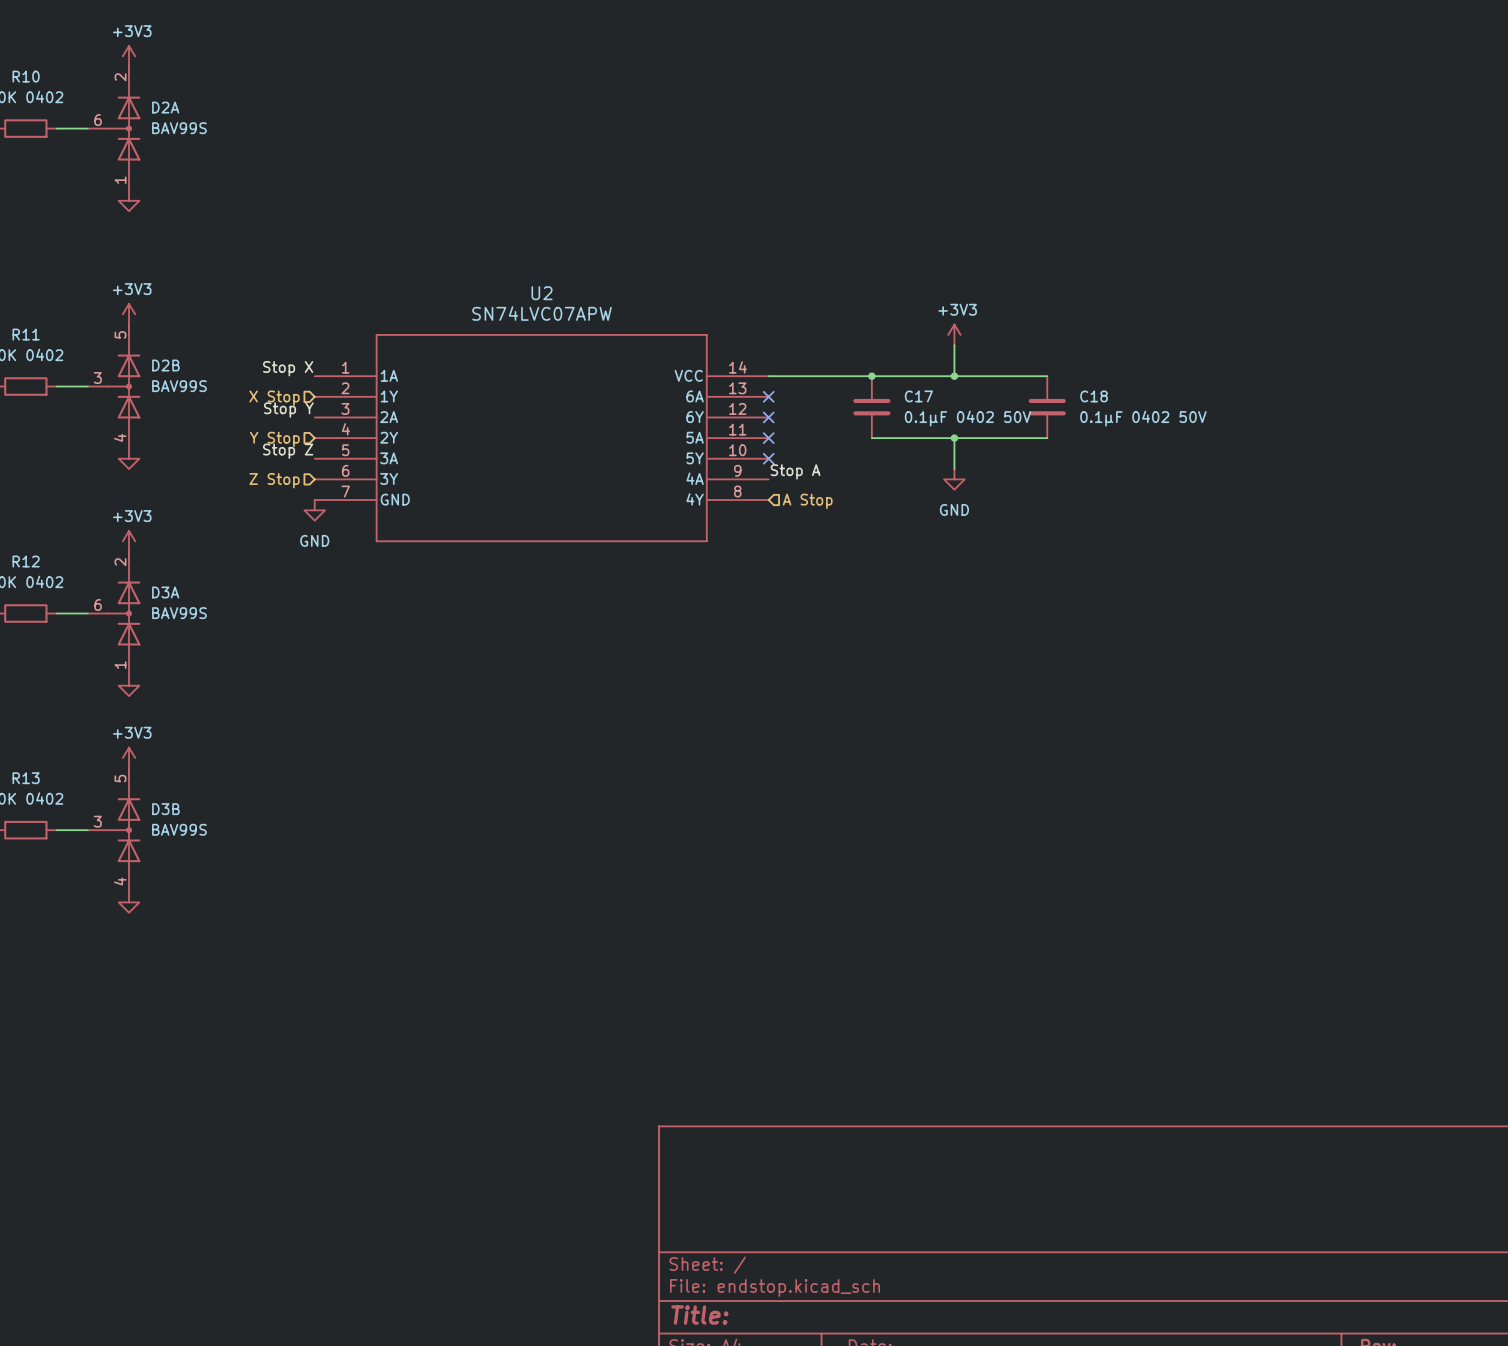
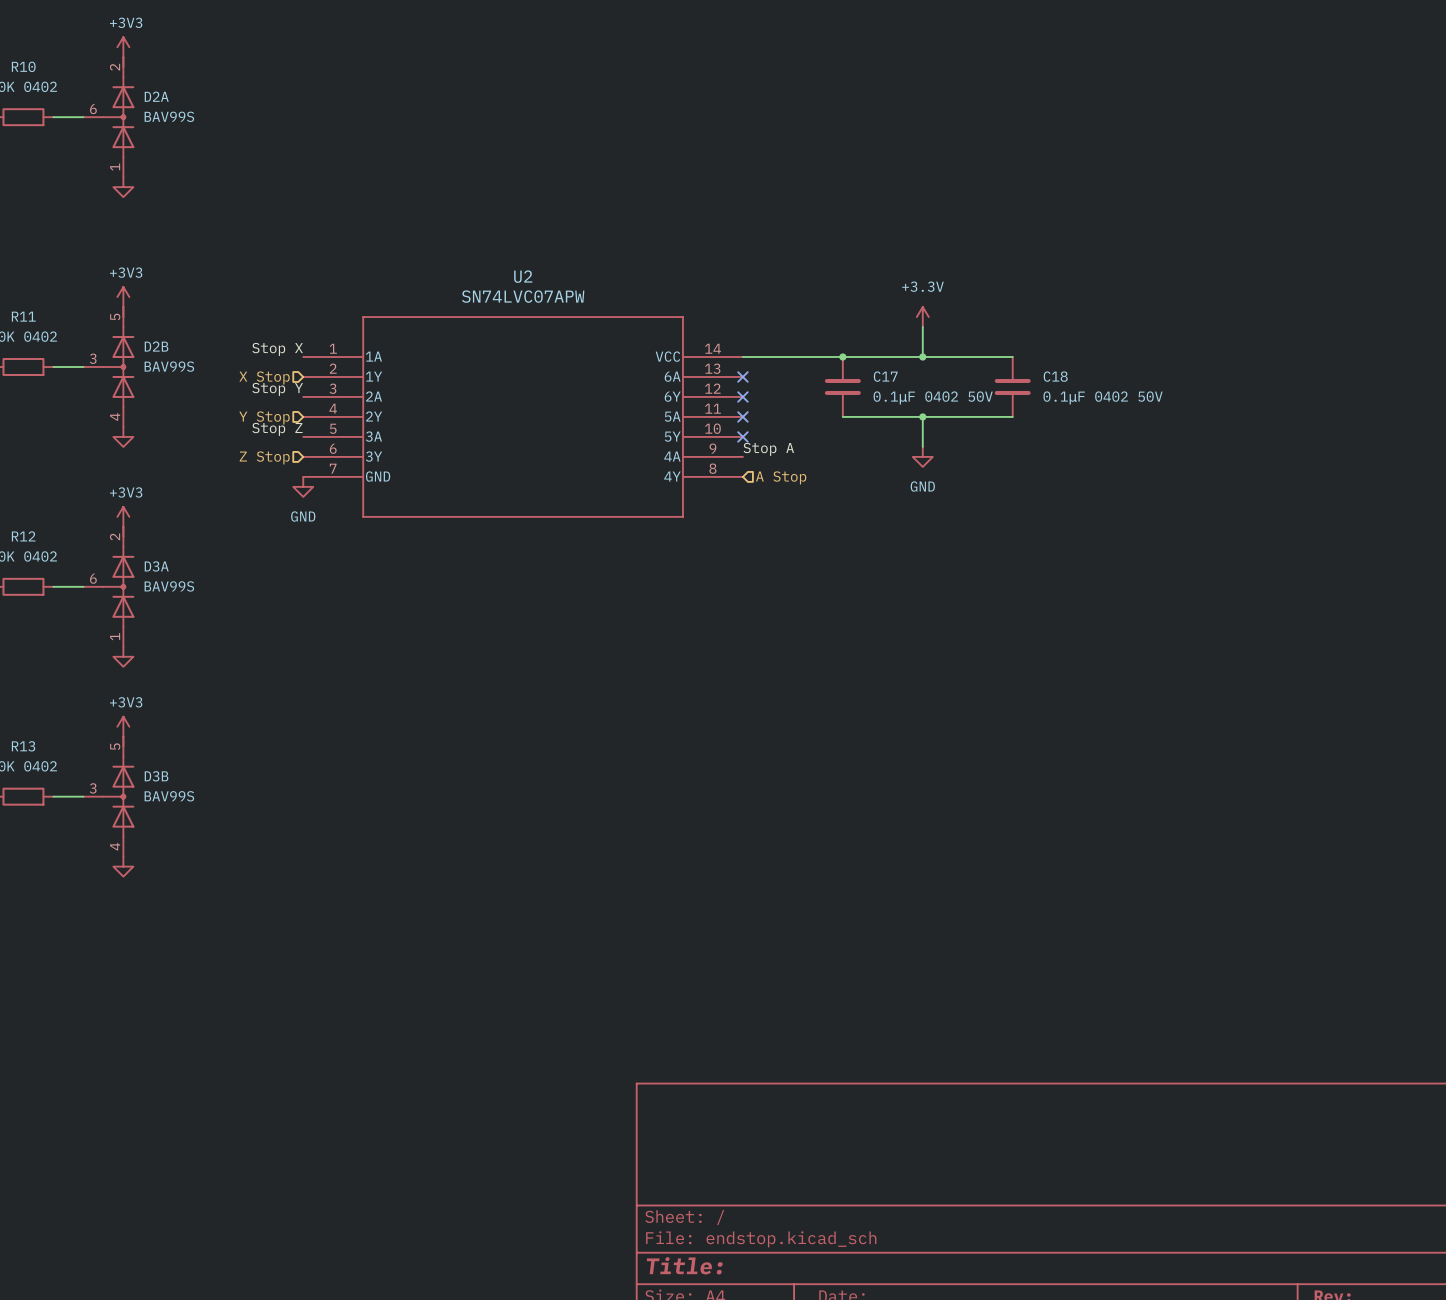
power symbol: +3V3 (954, 334) -> +3.3V (922, 317)

